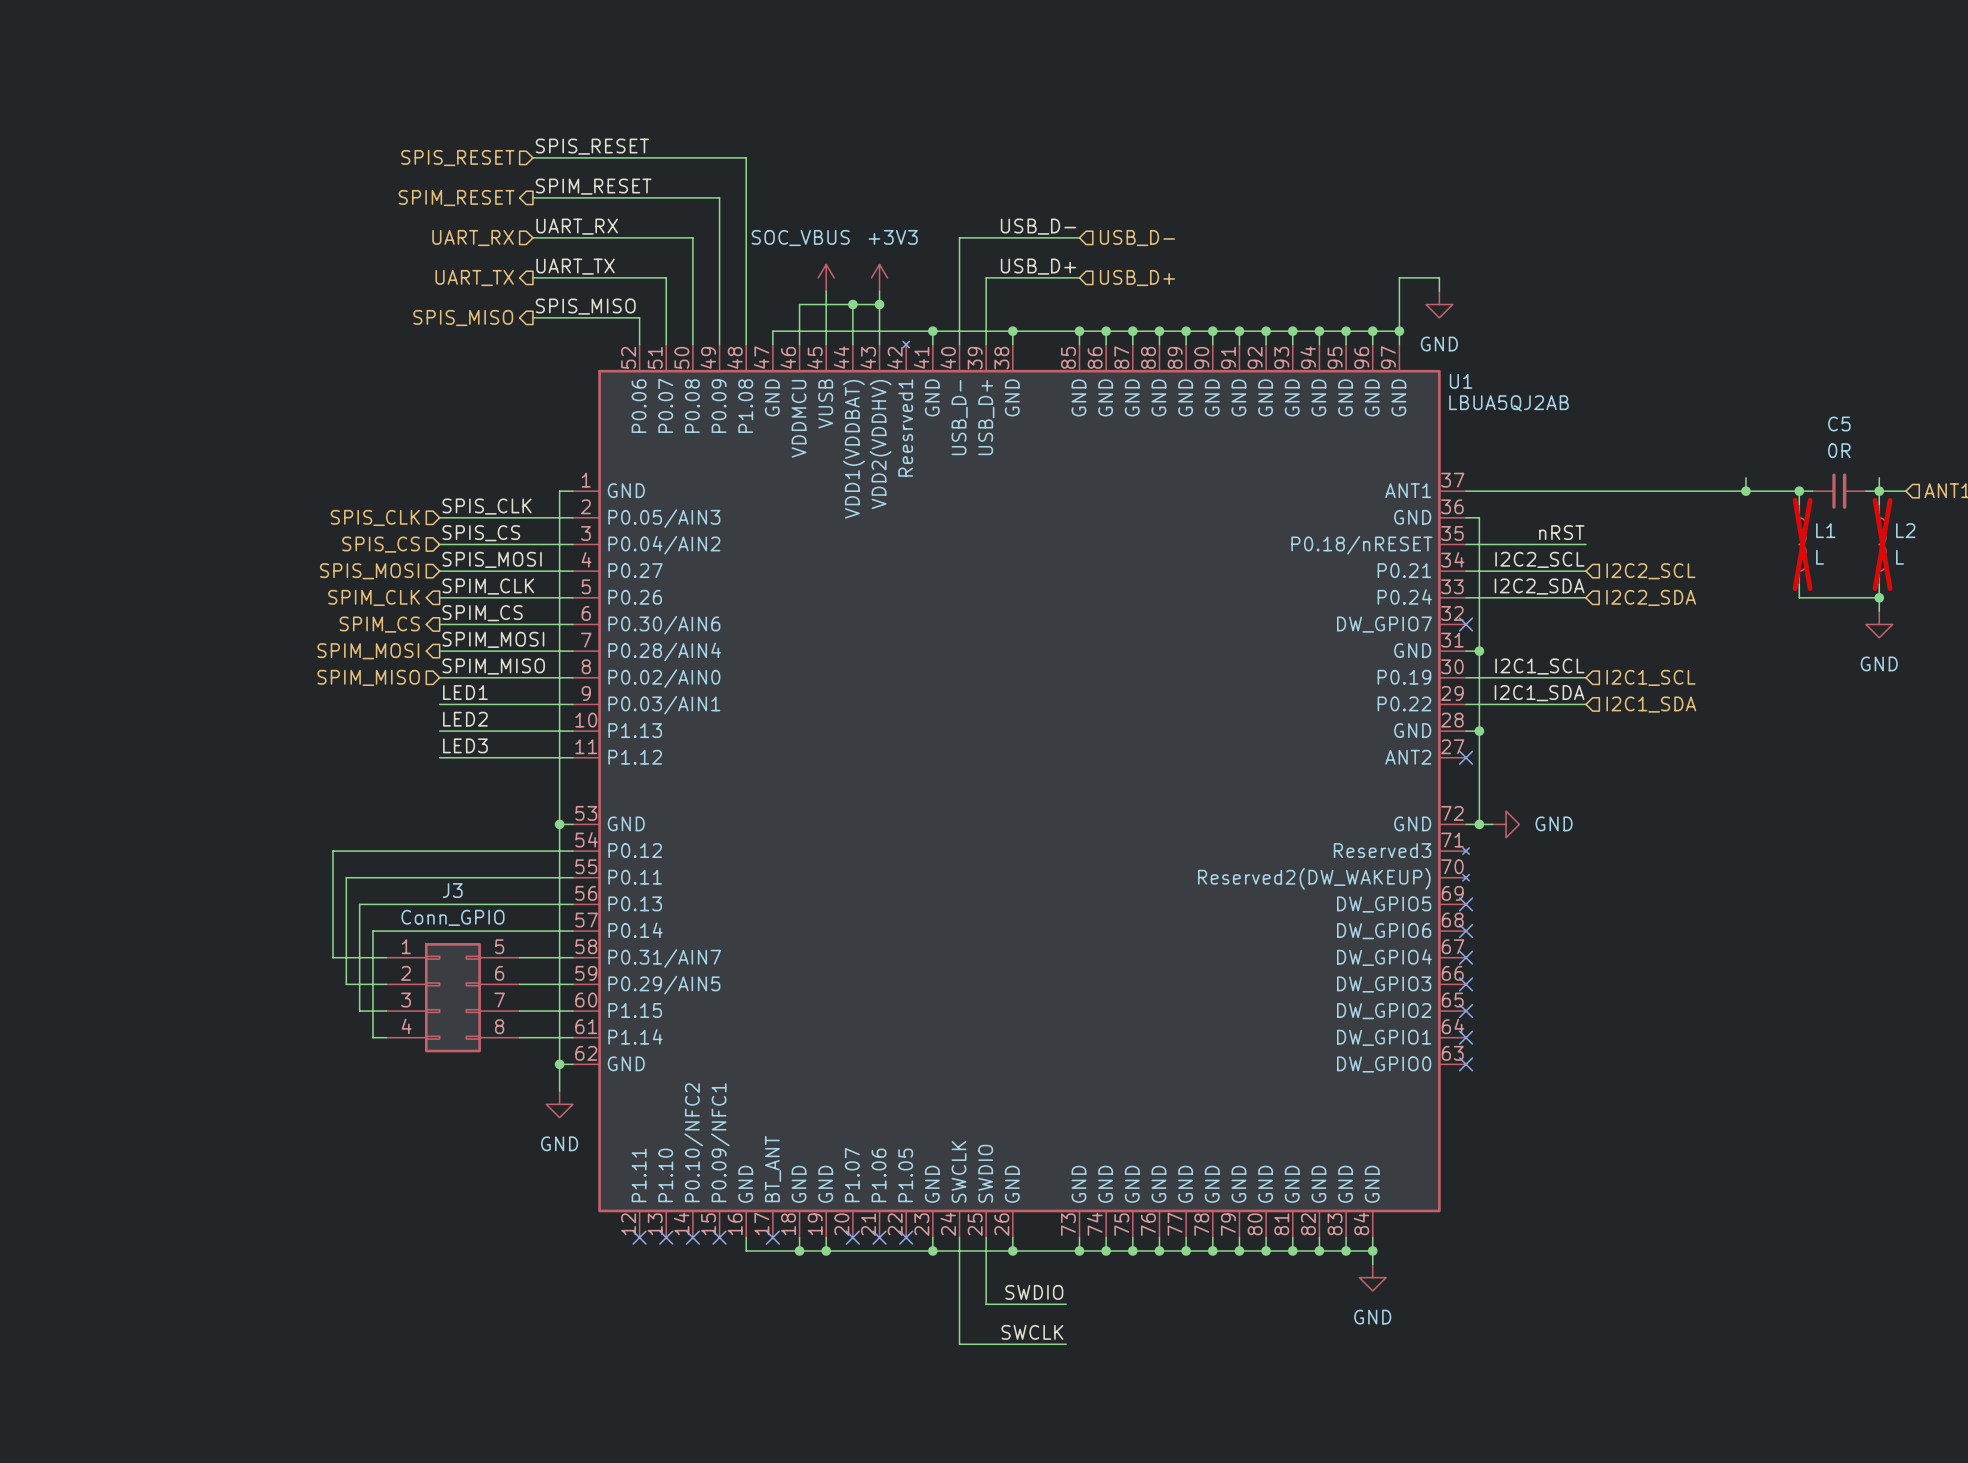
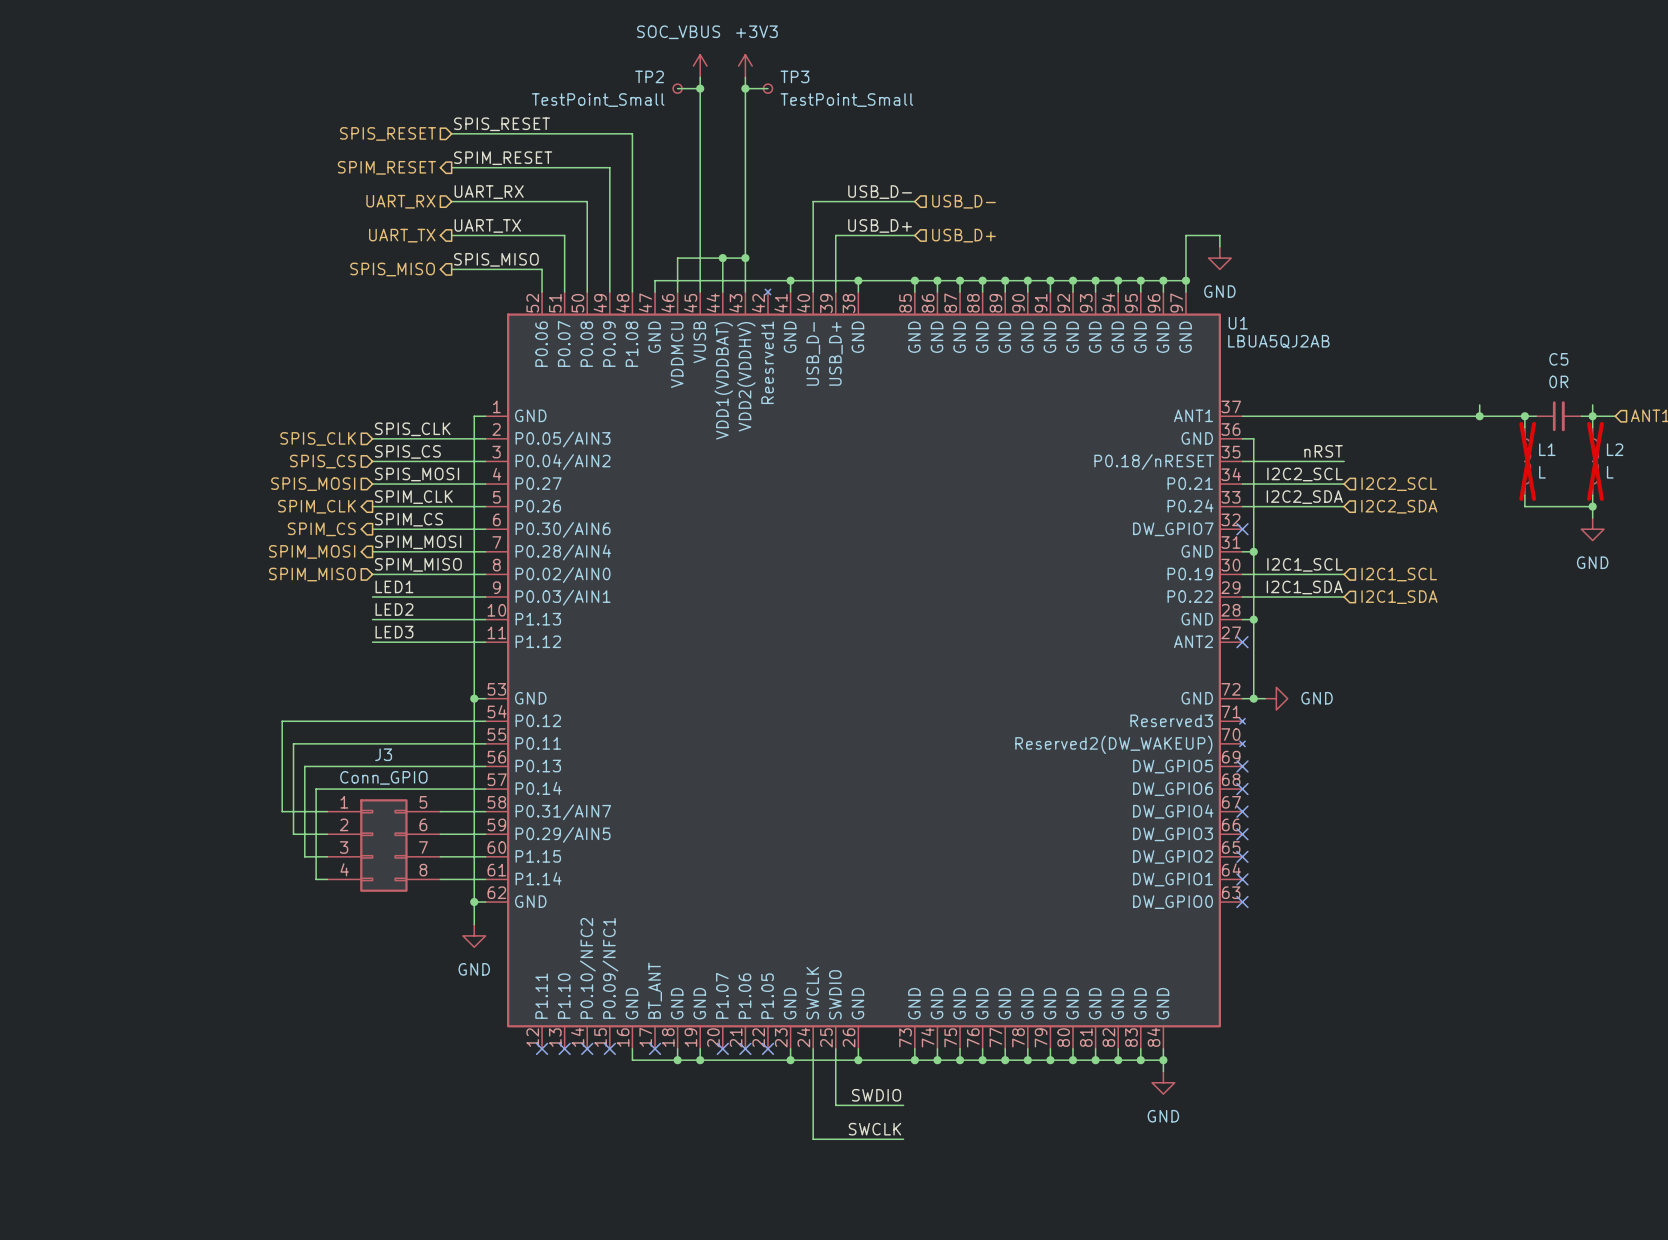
wire: none -> (700, 77) (700, 246)
wire: none -> (745, 77) (745, 246)
wire: none -> (677, 88) (700, 88)
TP2: none -> TestPoint_Small (677, 88)
junction: none -> (700, 88)
wire: none -> (745, 88) (767, 88)
junction: none -> (745, 88)
TP3: none -> TestPoint_Small (767, 88)
power symbol position: SOC_VBUS (826, 277) -> SOC_VBUS (700, 66)
power symbol position: +3V3 (879, 277) -> +3V3 (745, 66)

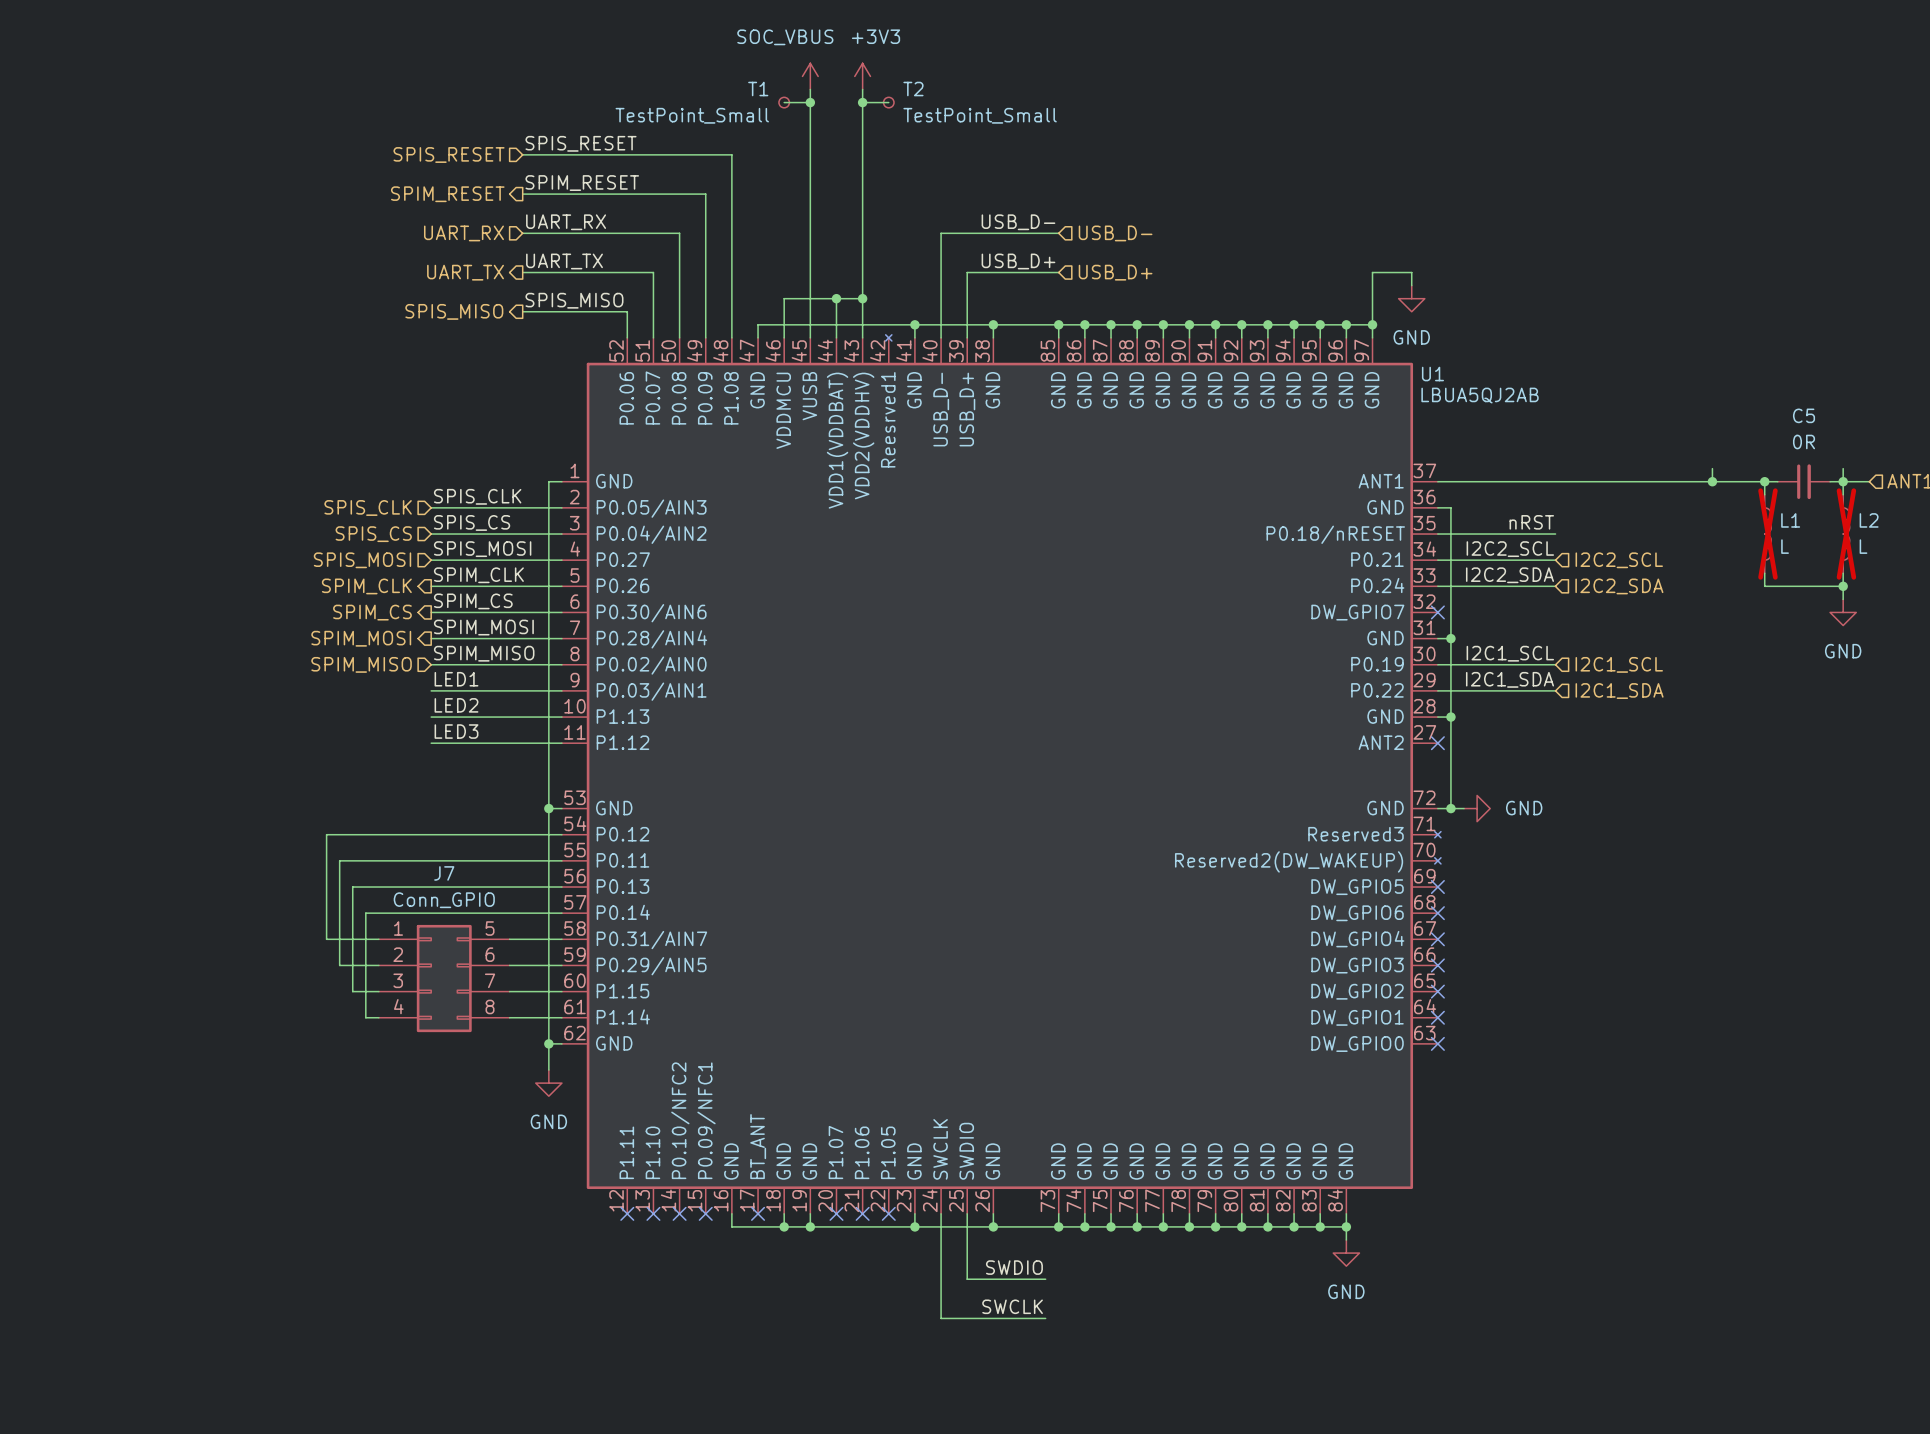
TP2 name: TP2 (649, 76) -> T1 (758, 89)
TP3 name: TP3 (794, 76) -> T2 (913, 89)
J3 name: J3 (383, 754) -> J7 (444, 873)

